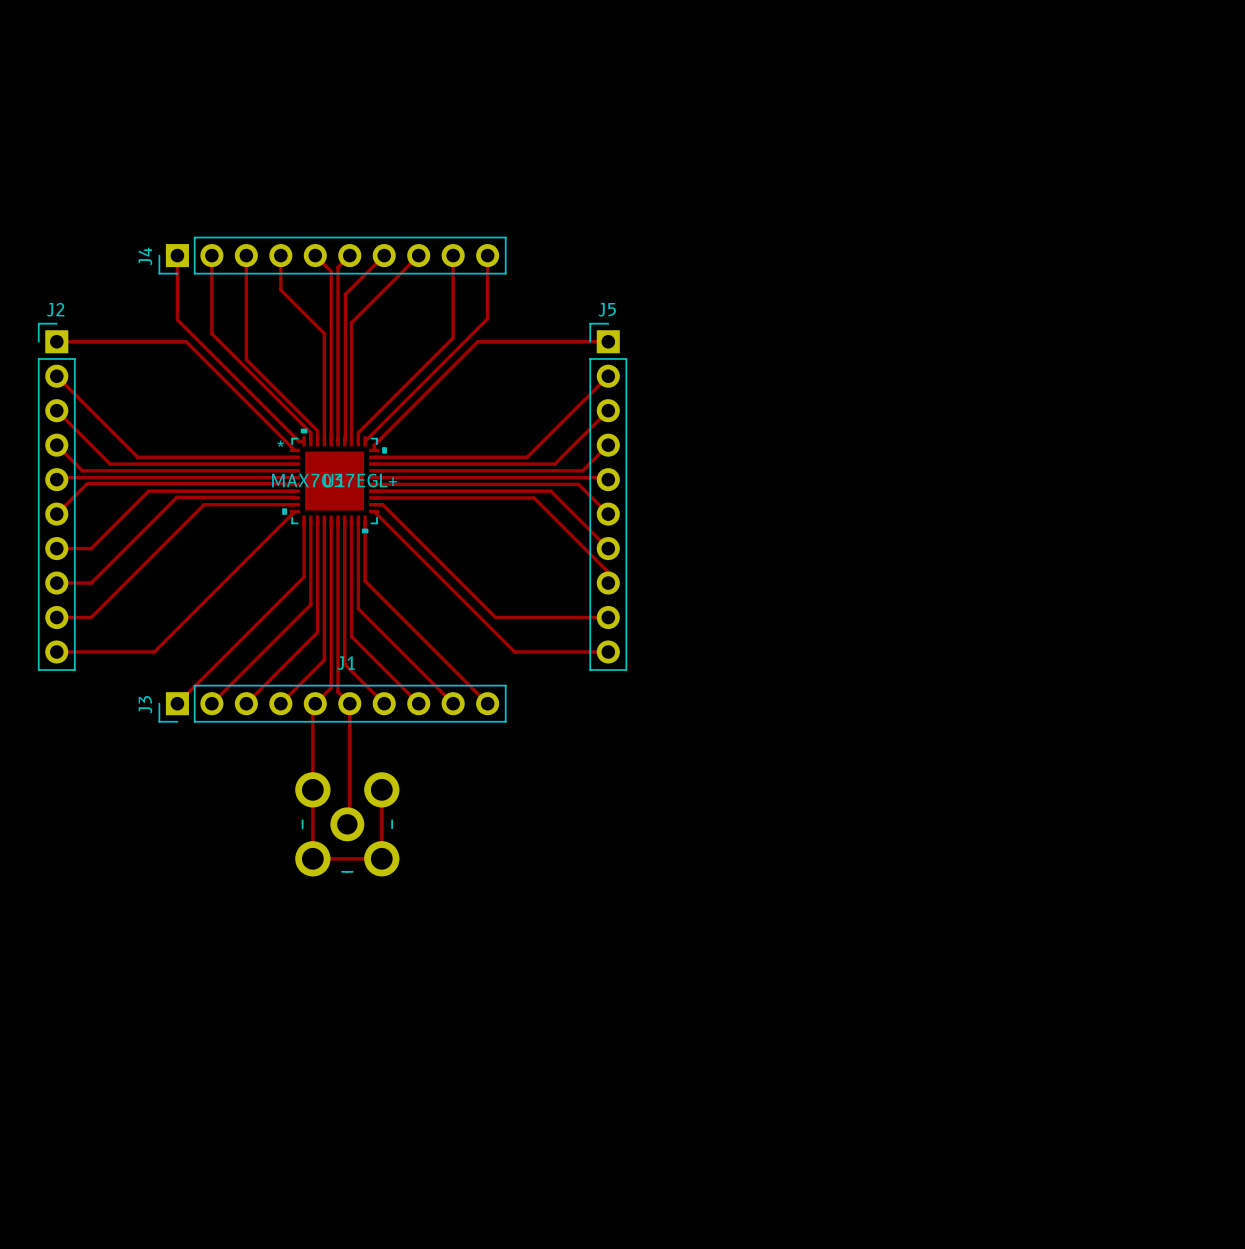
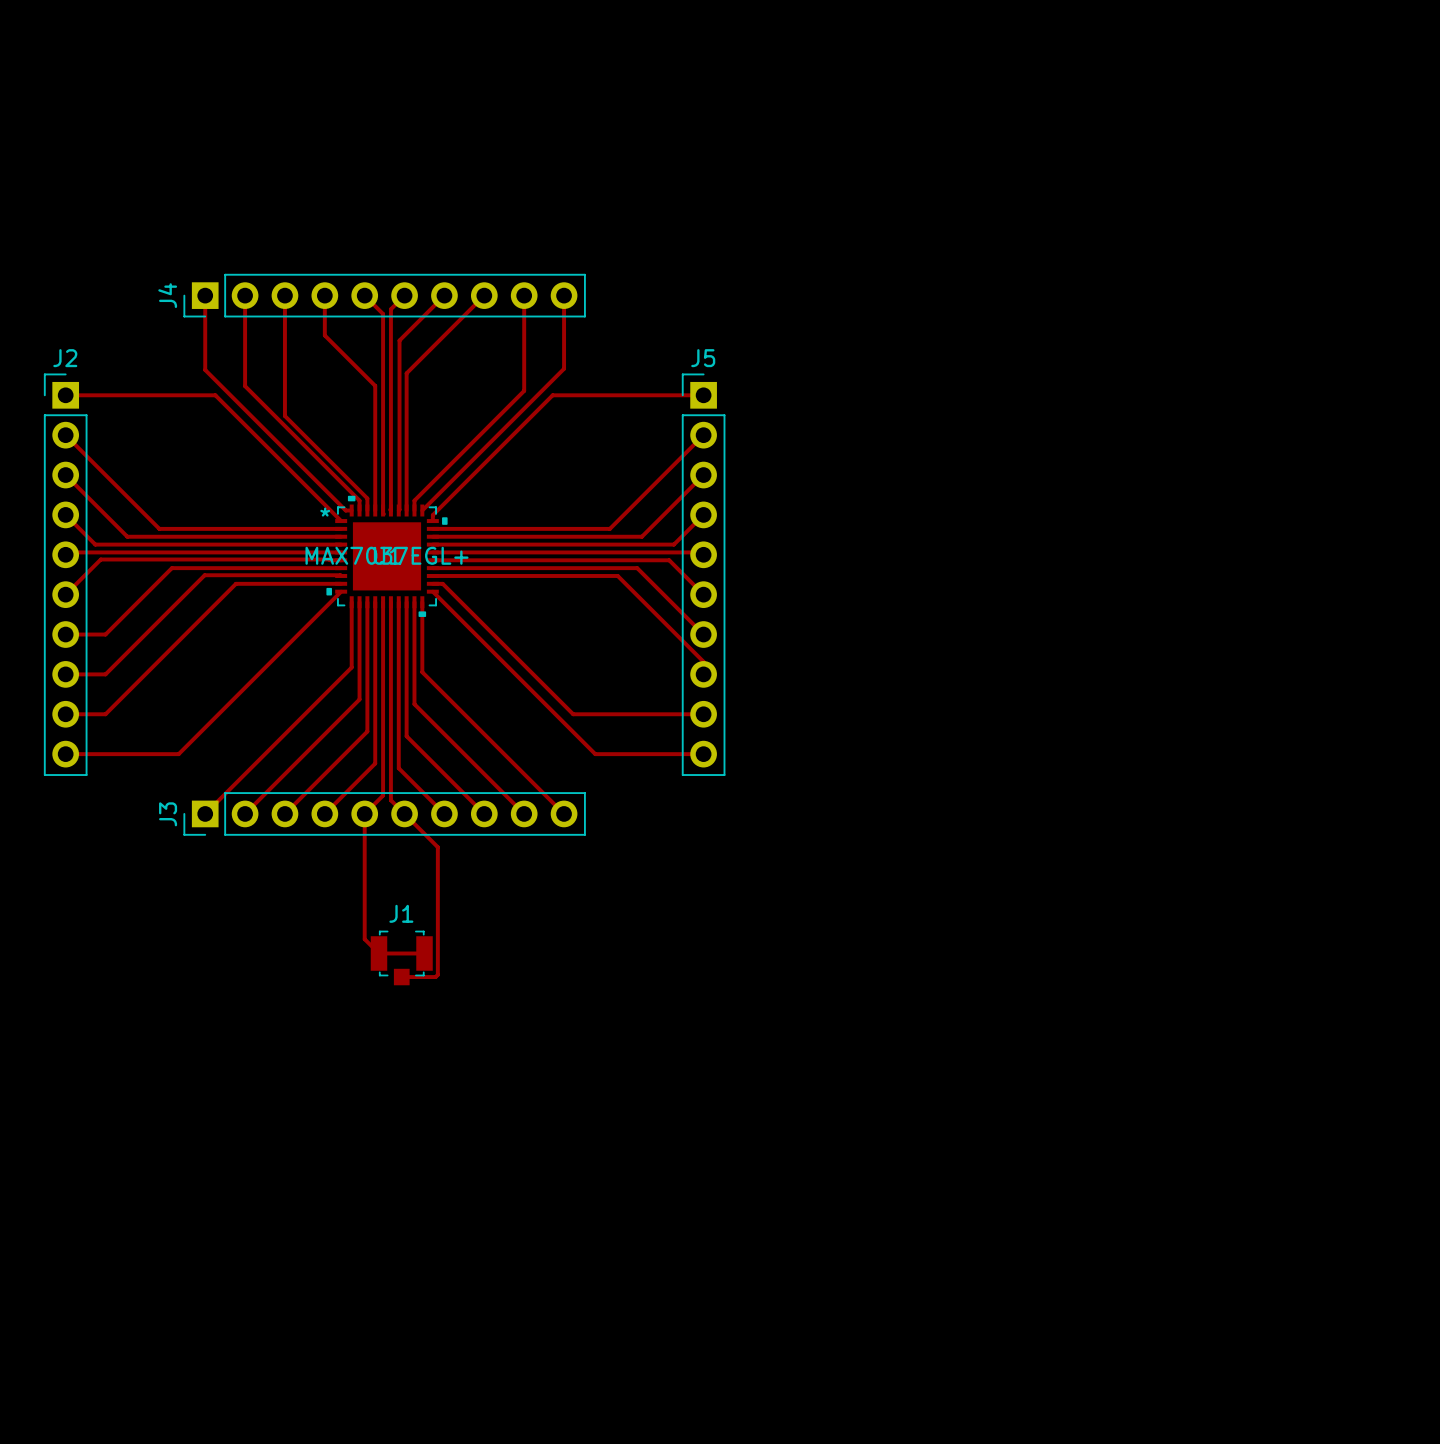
J1 name position: J1 (346, 663) -> J1 (401, 913)
top track: (315, 703) (312, 706) (312, 858) (381, 858) (381, 789) -> (364, 813) (364, 939) (378, 953) (424, 953)
top track: (349, 703) (349, 821) (347, 824) -> (404, 813) (437, 847) (437, 974)
J1 footprint: [295, 772, 400, 877] -> [370, 930, 433, 986]
top track: none -> (401, 977) (435, 977)

